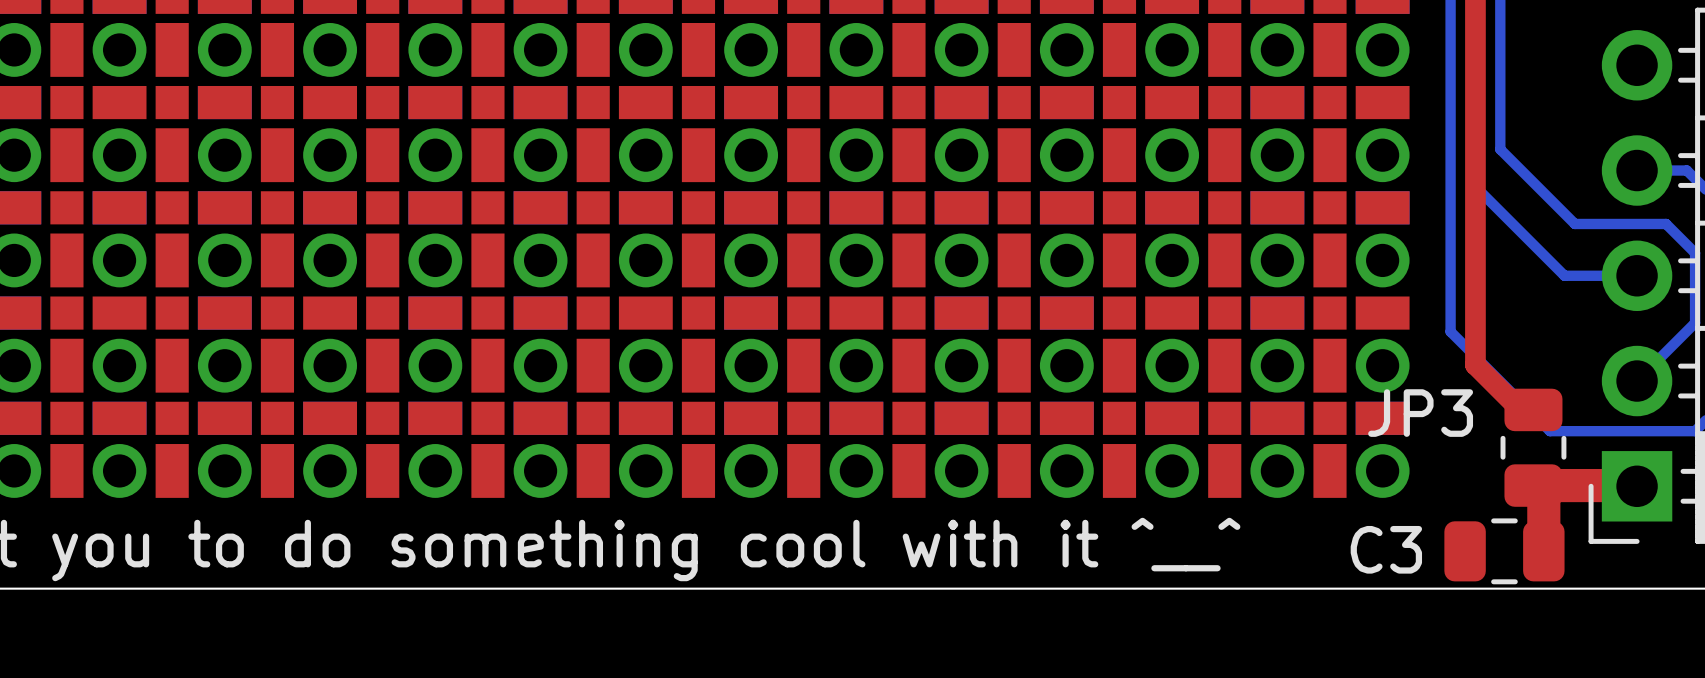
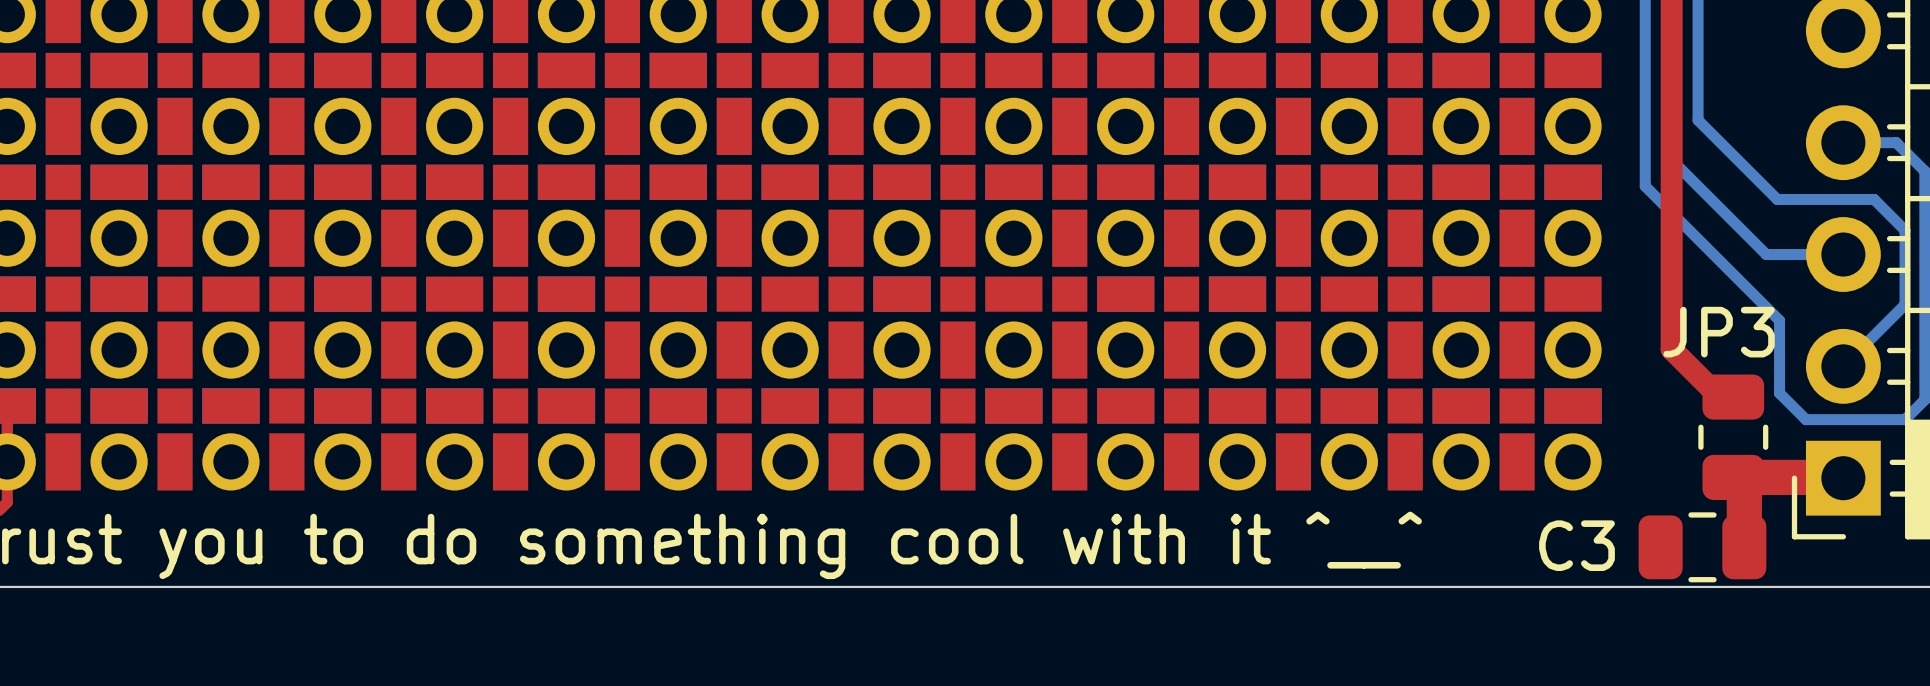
bottom track: (1450, 211) (1450, 331) (1550, 431) (1601, 431) -> (1645, 186) (1779, 320) (1779, 393) (1805, 419)
JP3 name position: JP3 (1420, 413) -> JP3 (1719, 332)

